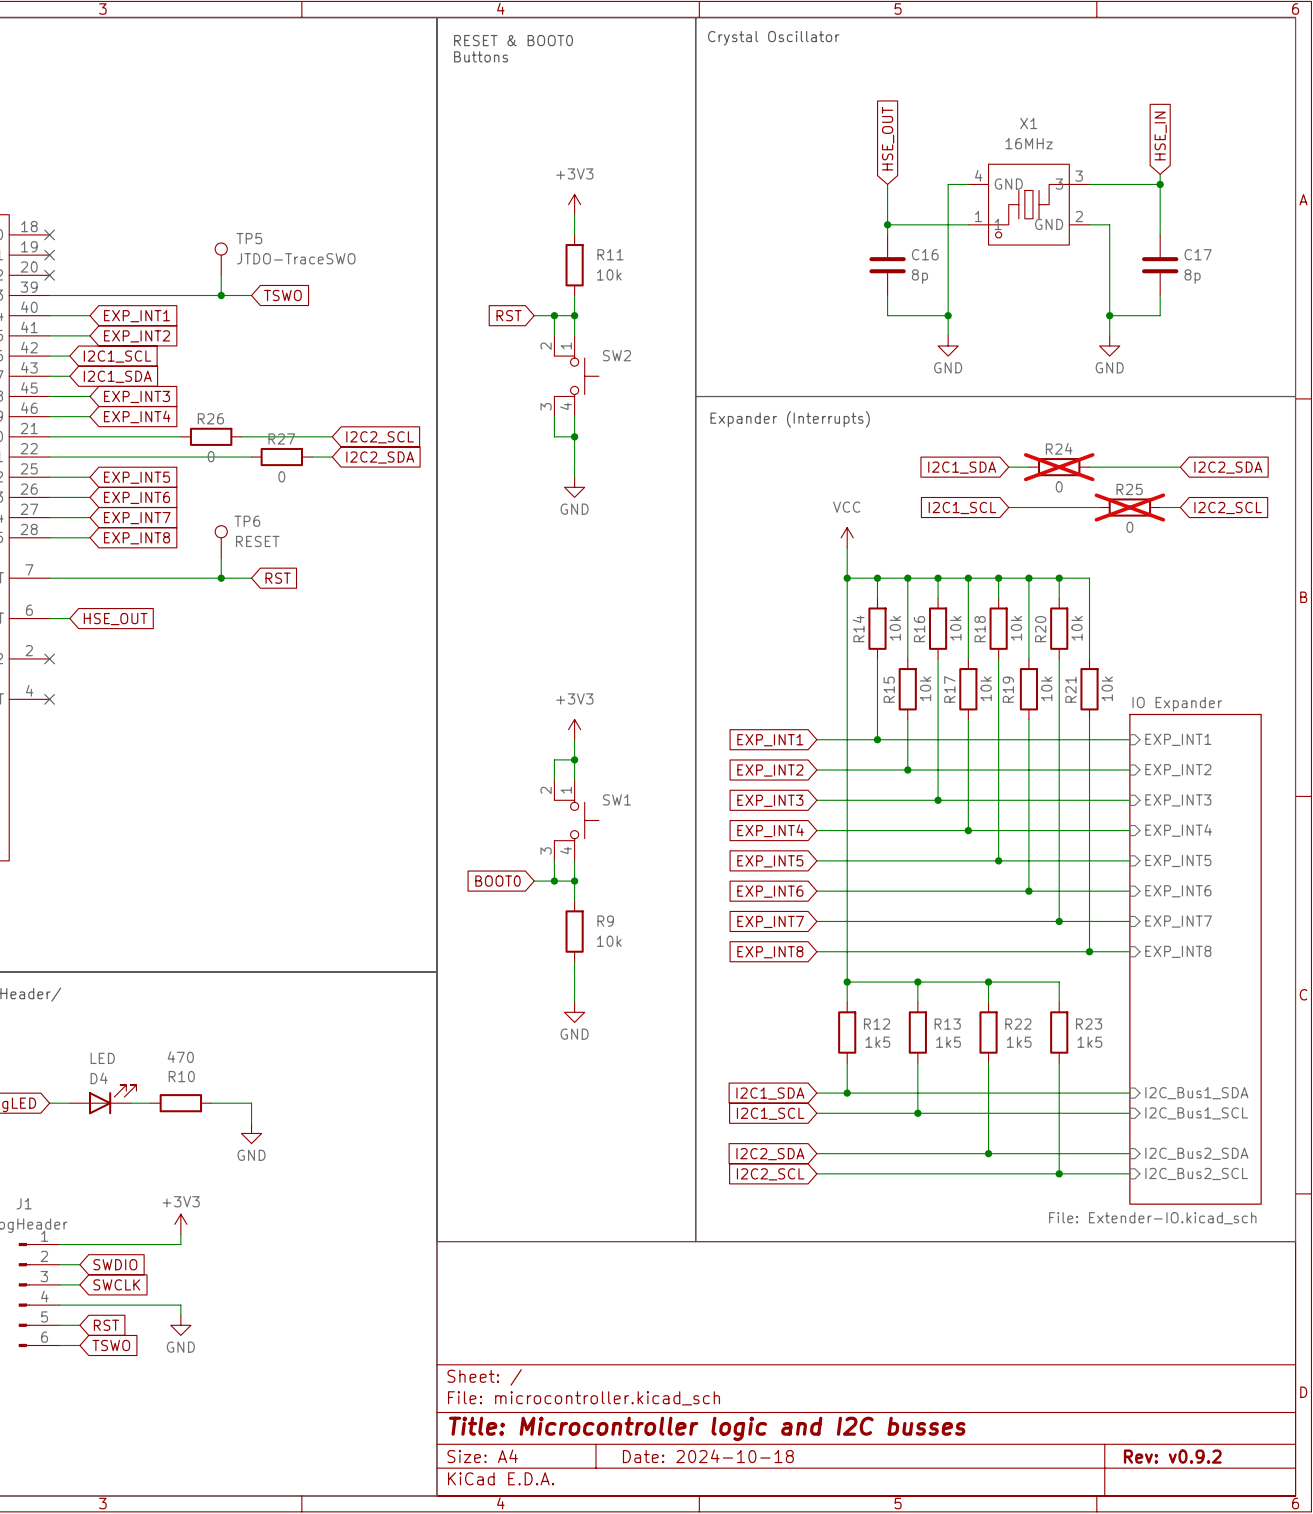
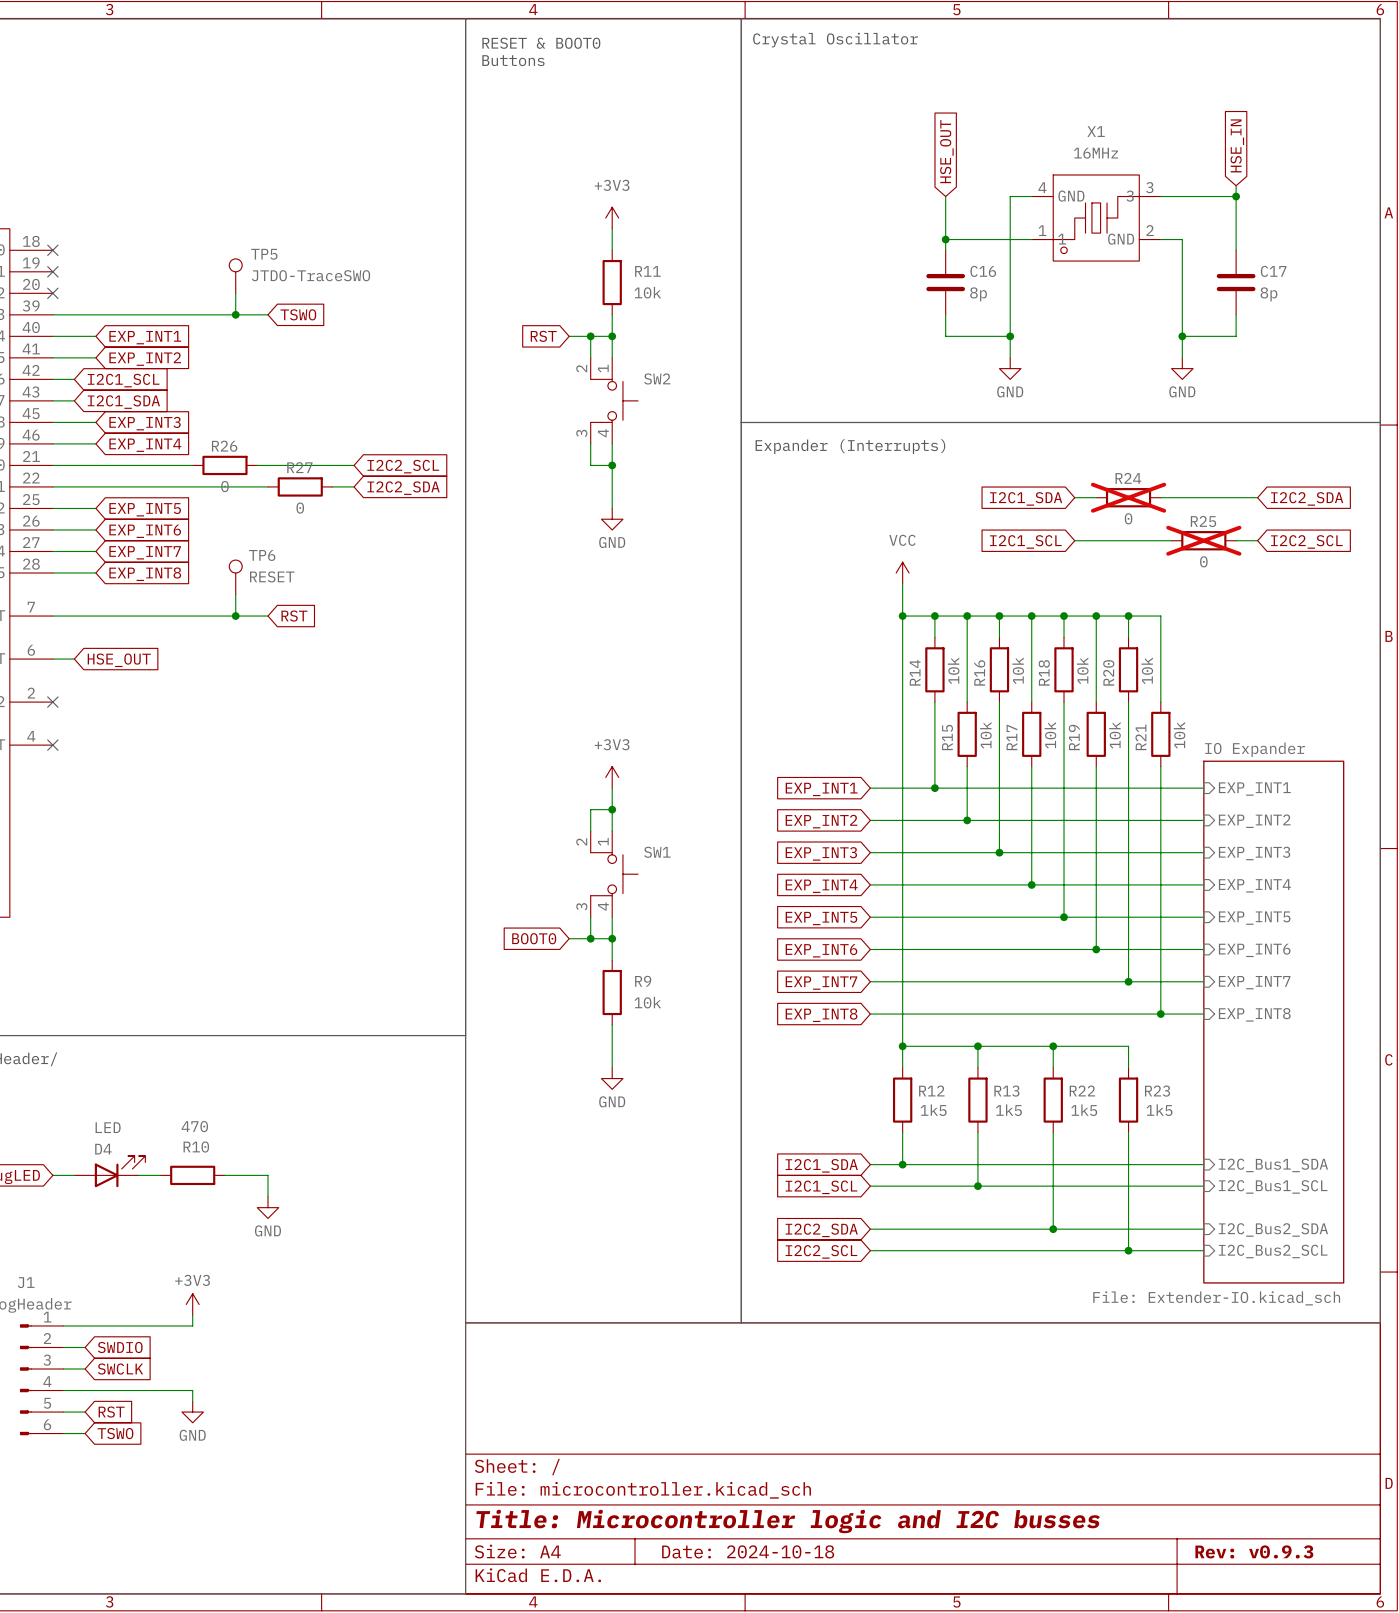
title block: Rev: v0.9.2 (1172, 1456) -> Rev: v0.9.3 (1254, 1551)

